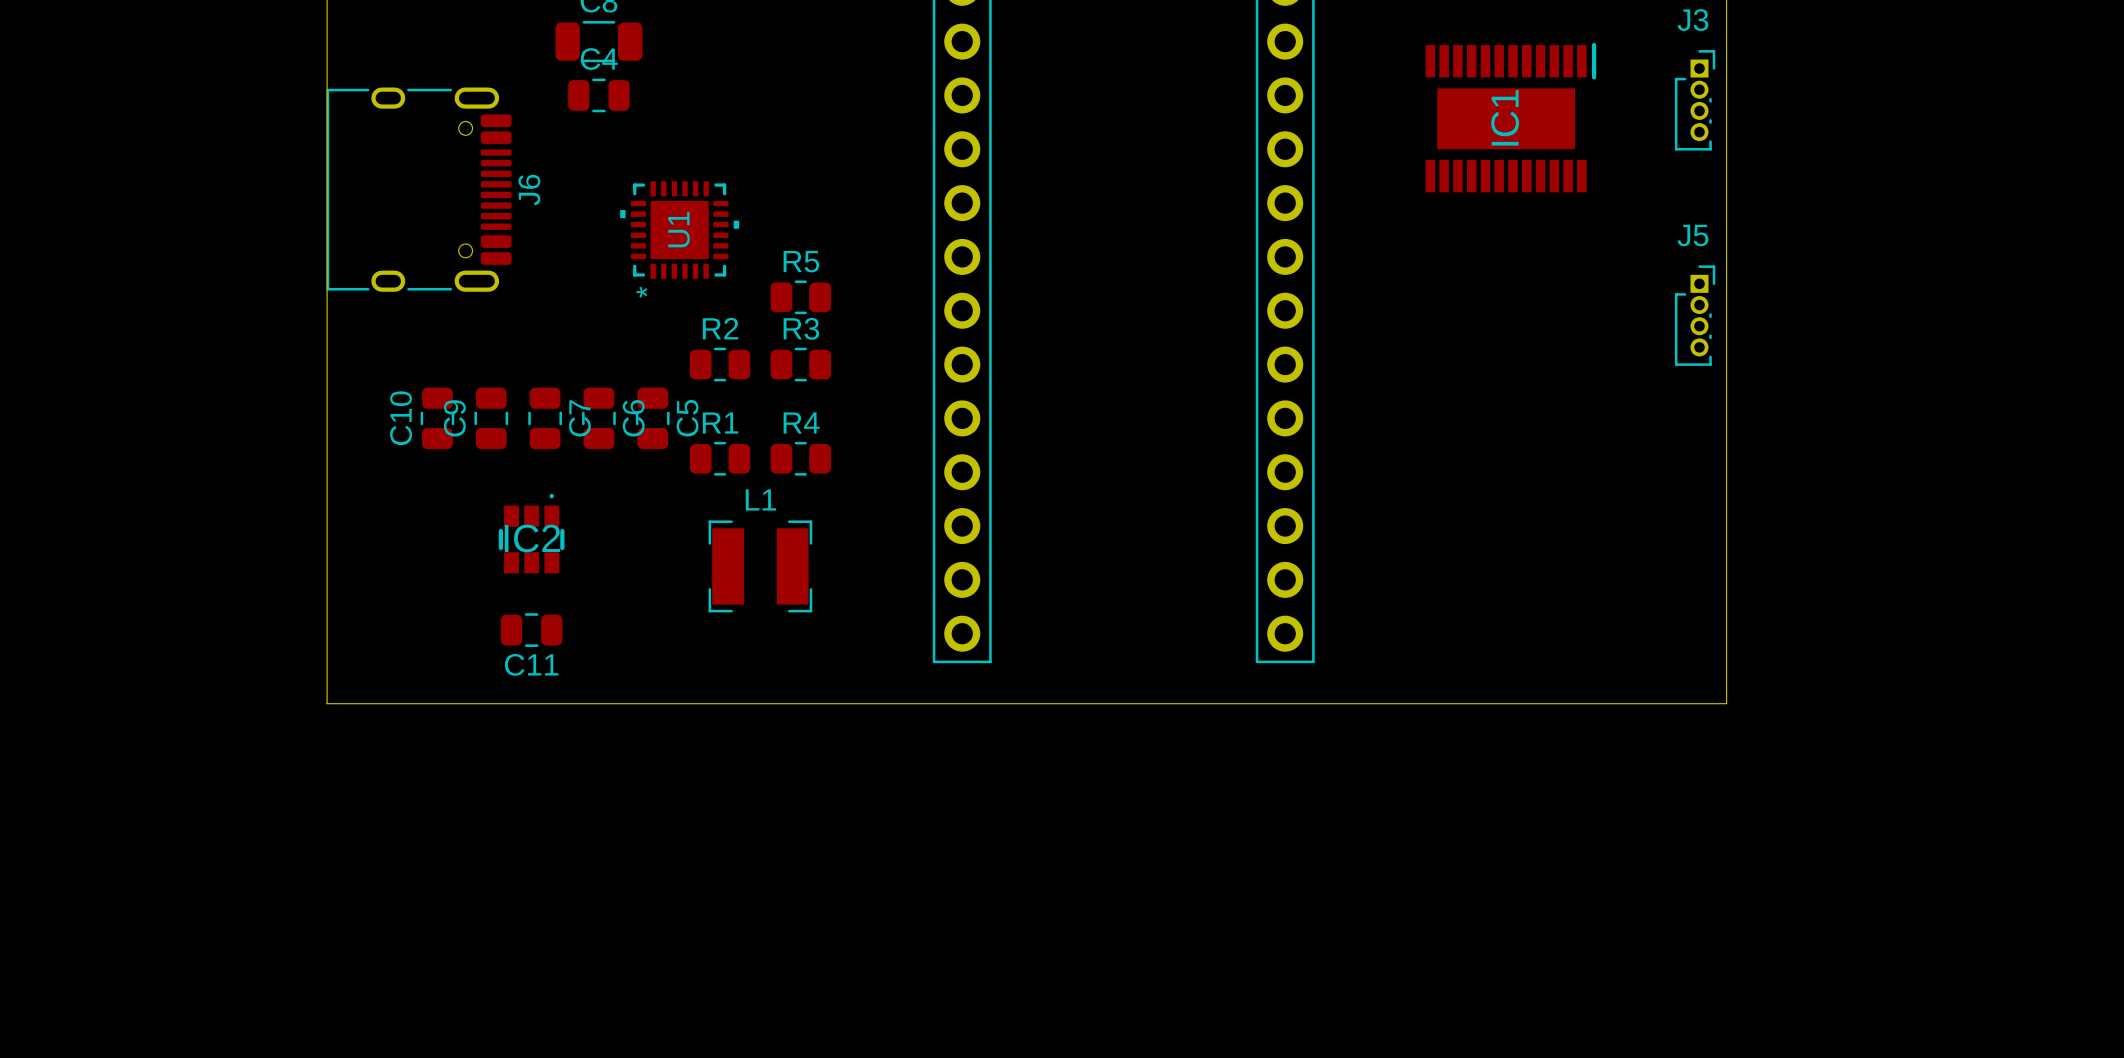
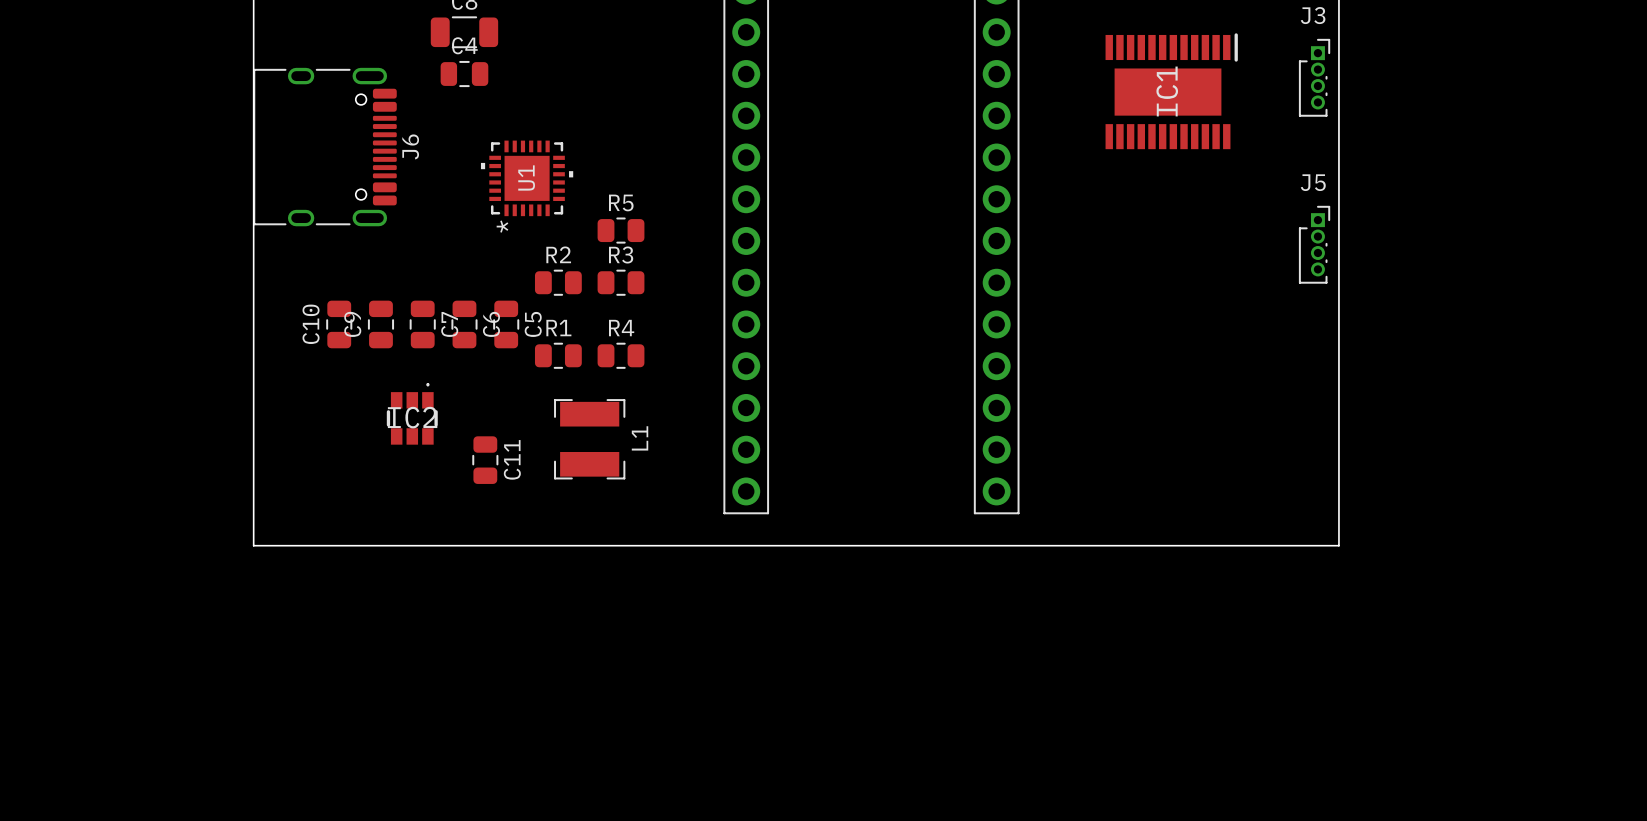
L1 rotation: 0° (760, 566) -> 90° clockwise (589, 439)
C11 rotation: 0° (531, 630) -> 90° clockwise (485, 460)
C11 position: (531, 630) -> (485, 460)
C11 name position: C11 (531, 664) -> C11 (512, 459)

